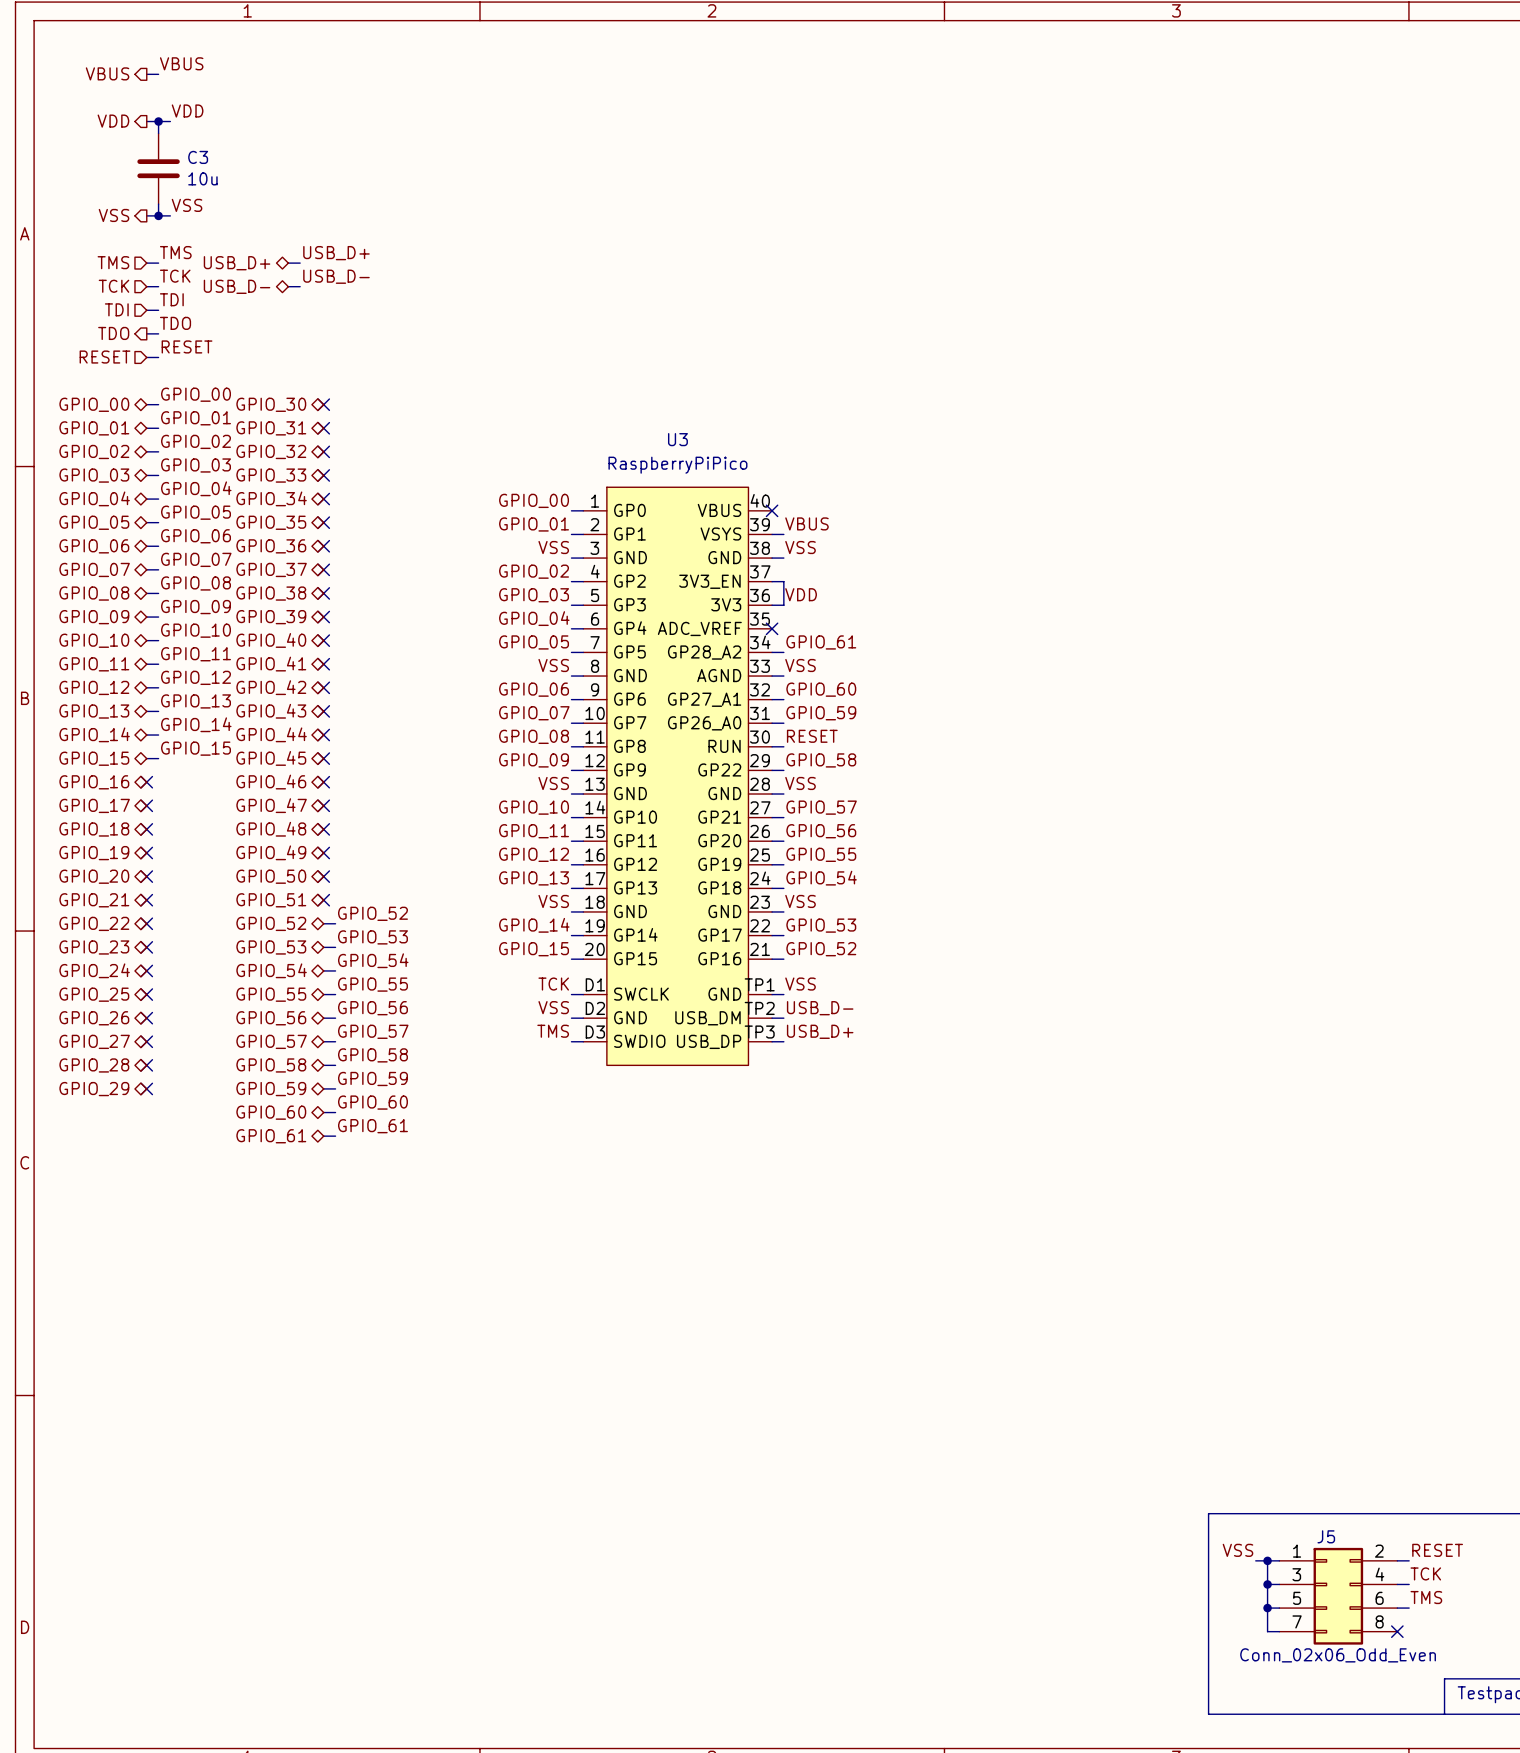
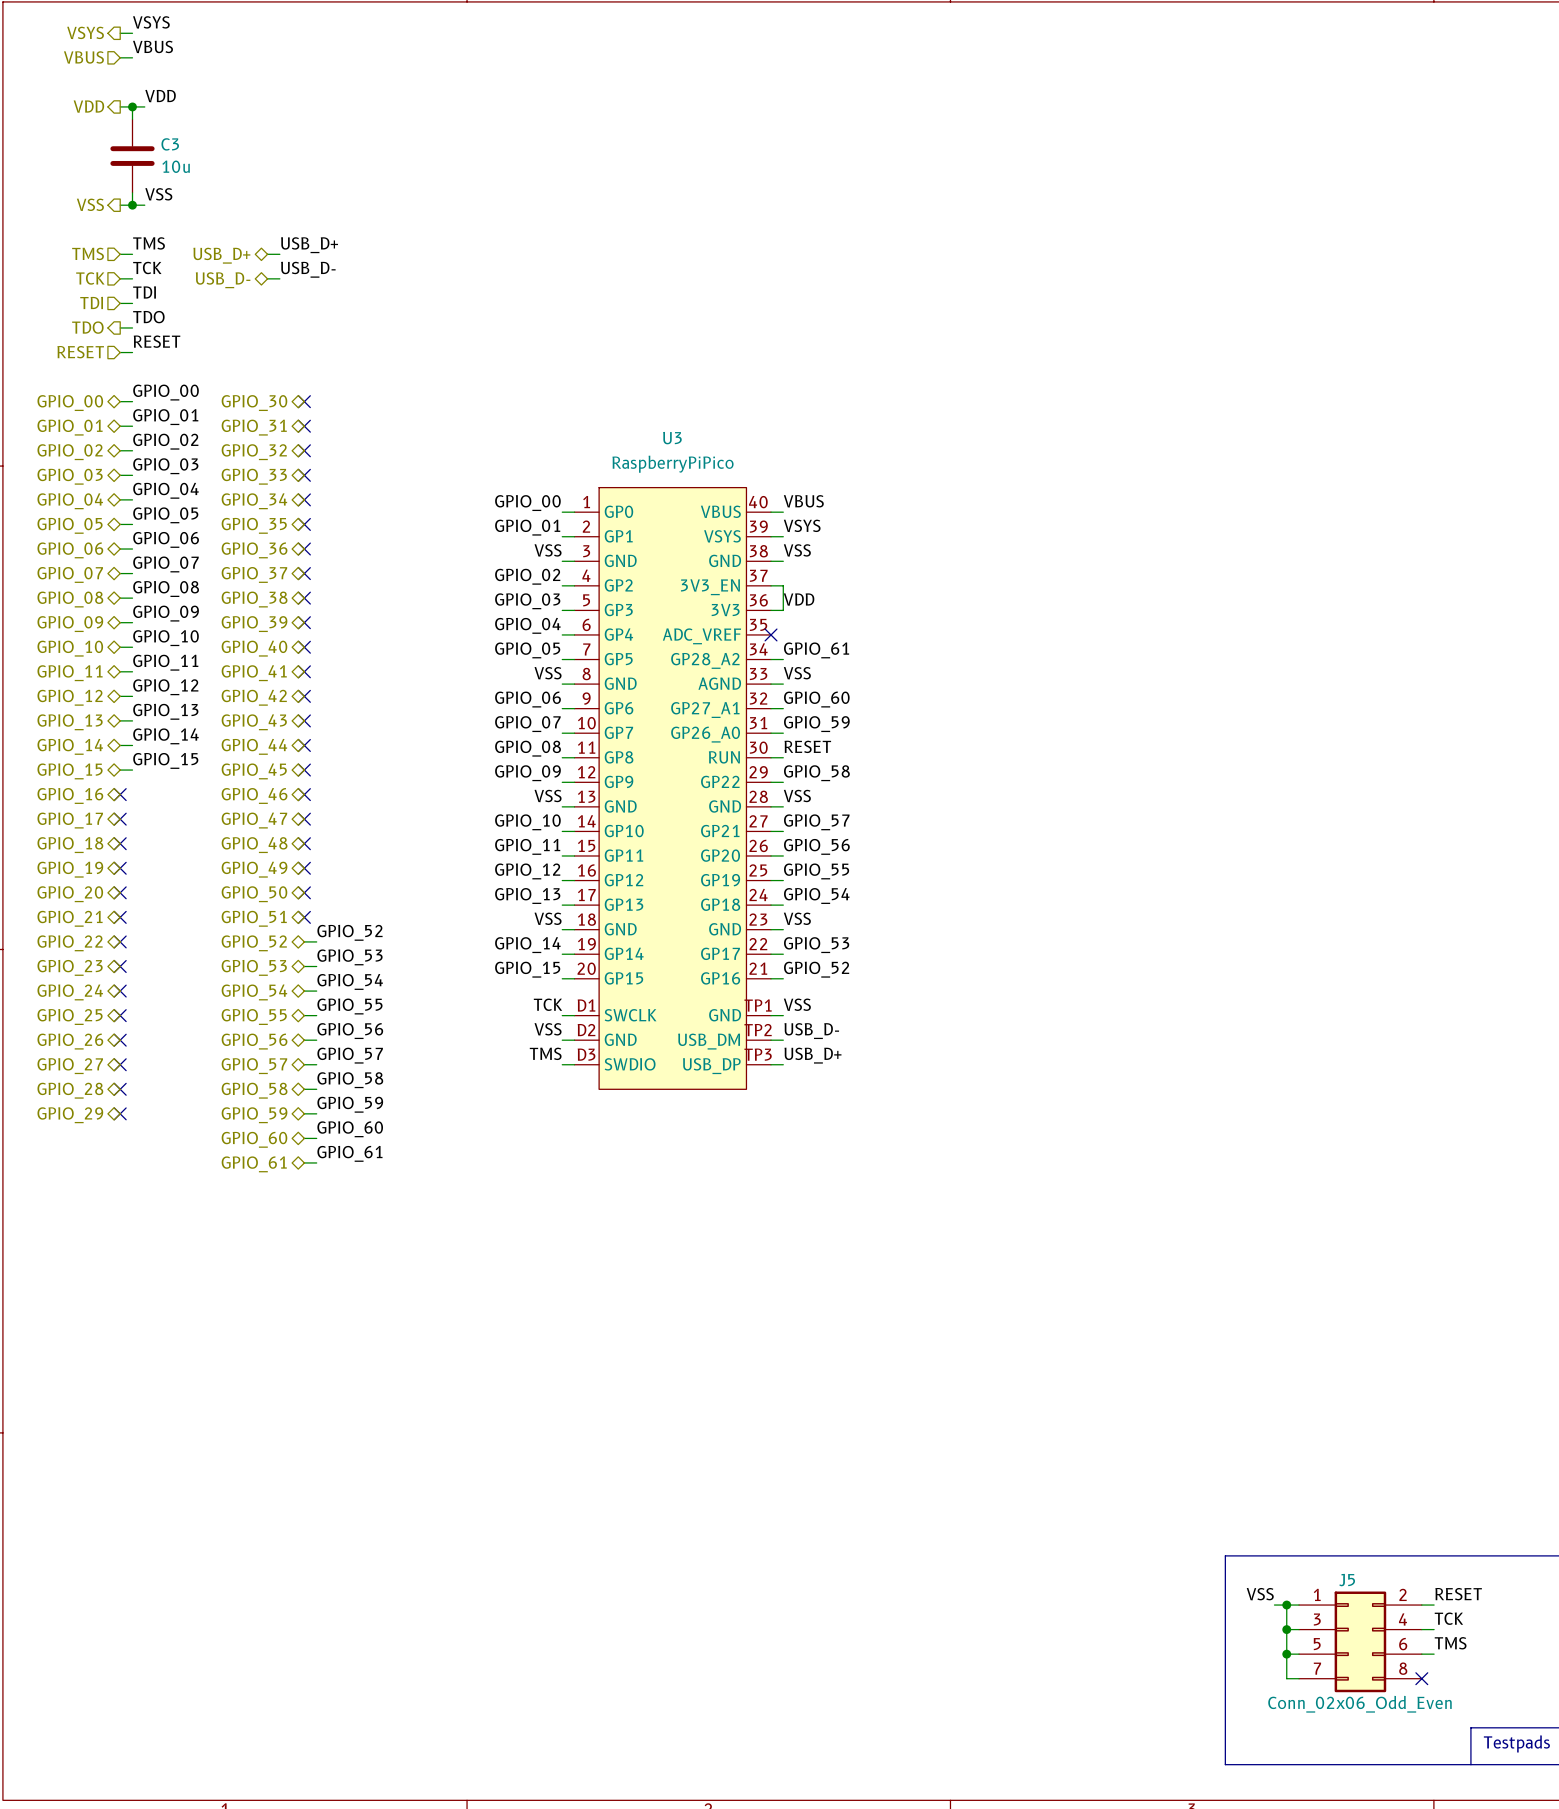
label: none -> VSYS (151, 22)
hierarchical label: none -> VSYS (85, 32)
wire: none -> (120, 33) (132, 33)
hierarchical label shape: output (107, 73) -> input (83, 57)
label: none -> VBUS (803, 501)
wire: none -> (771, 512) (783, 512)
no-connect mark: (772, 510) -> none
label: VBUS (806, 523) -> VSYS (802, 525)

